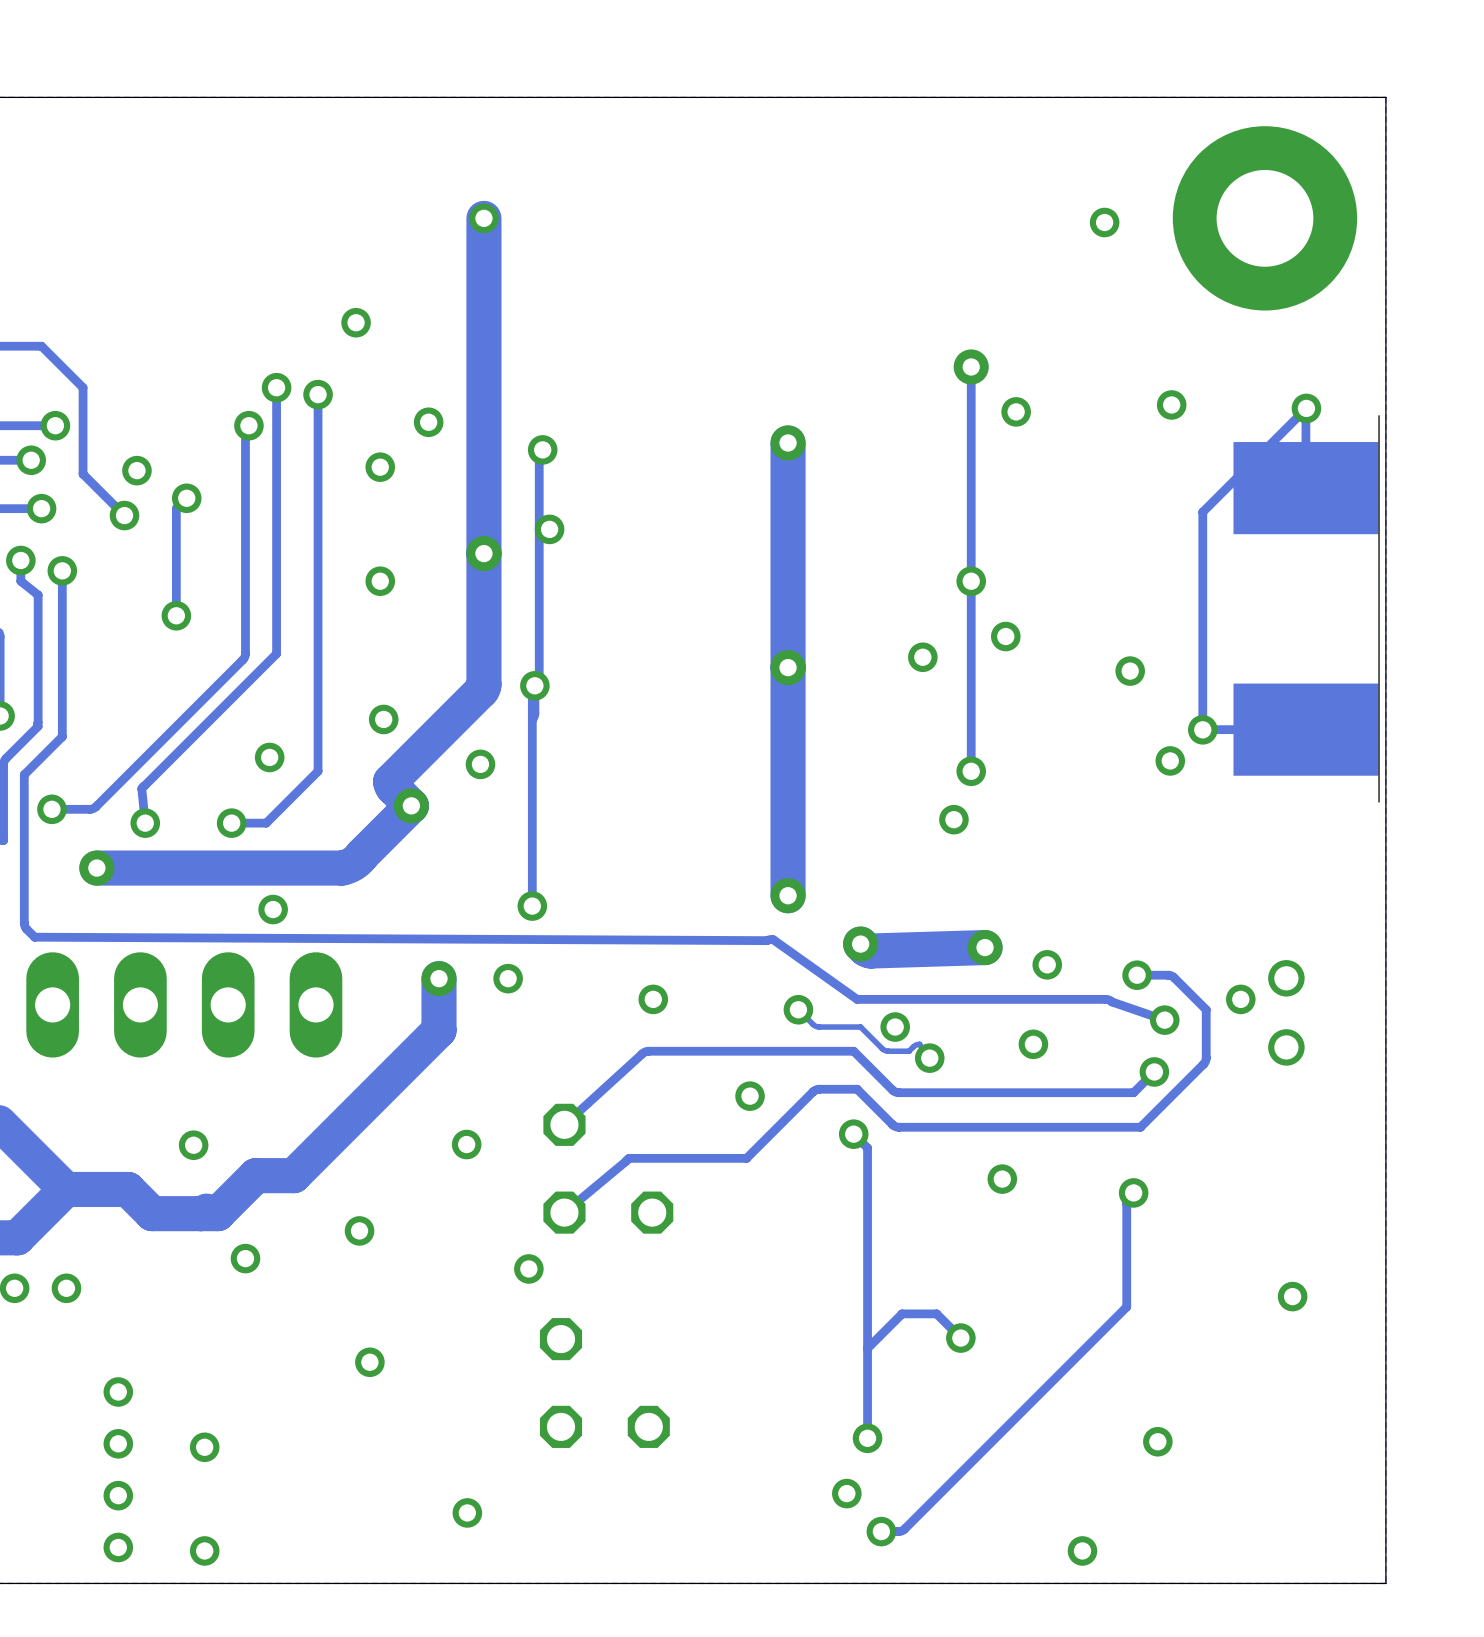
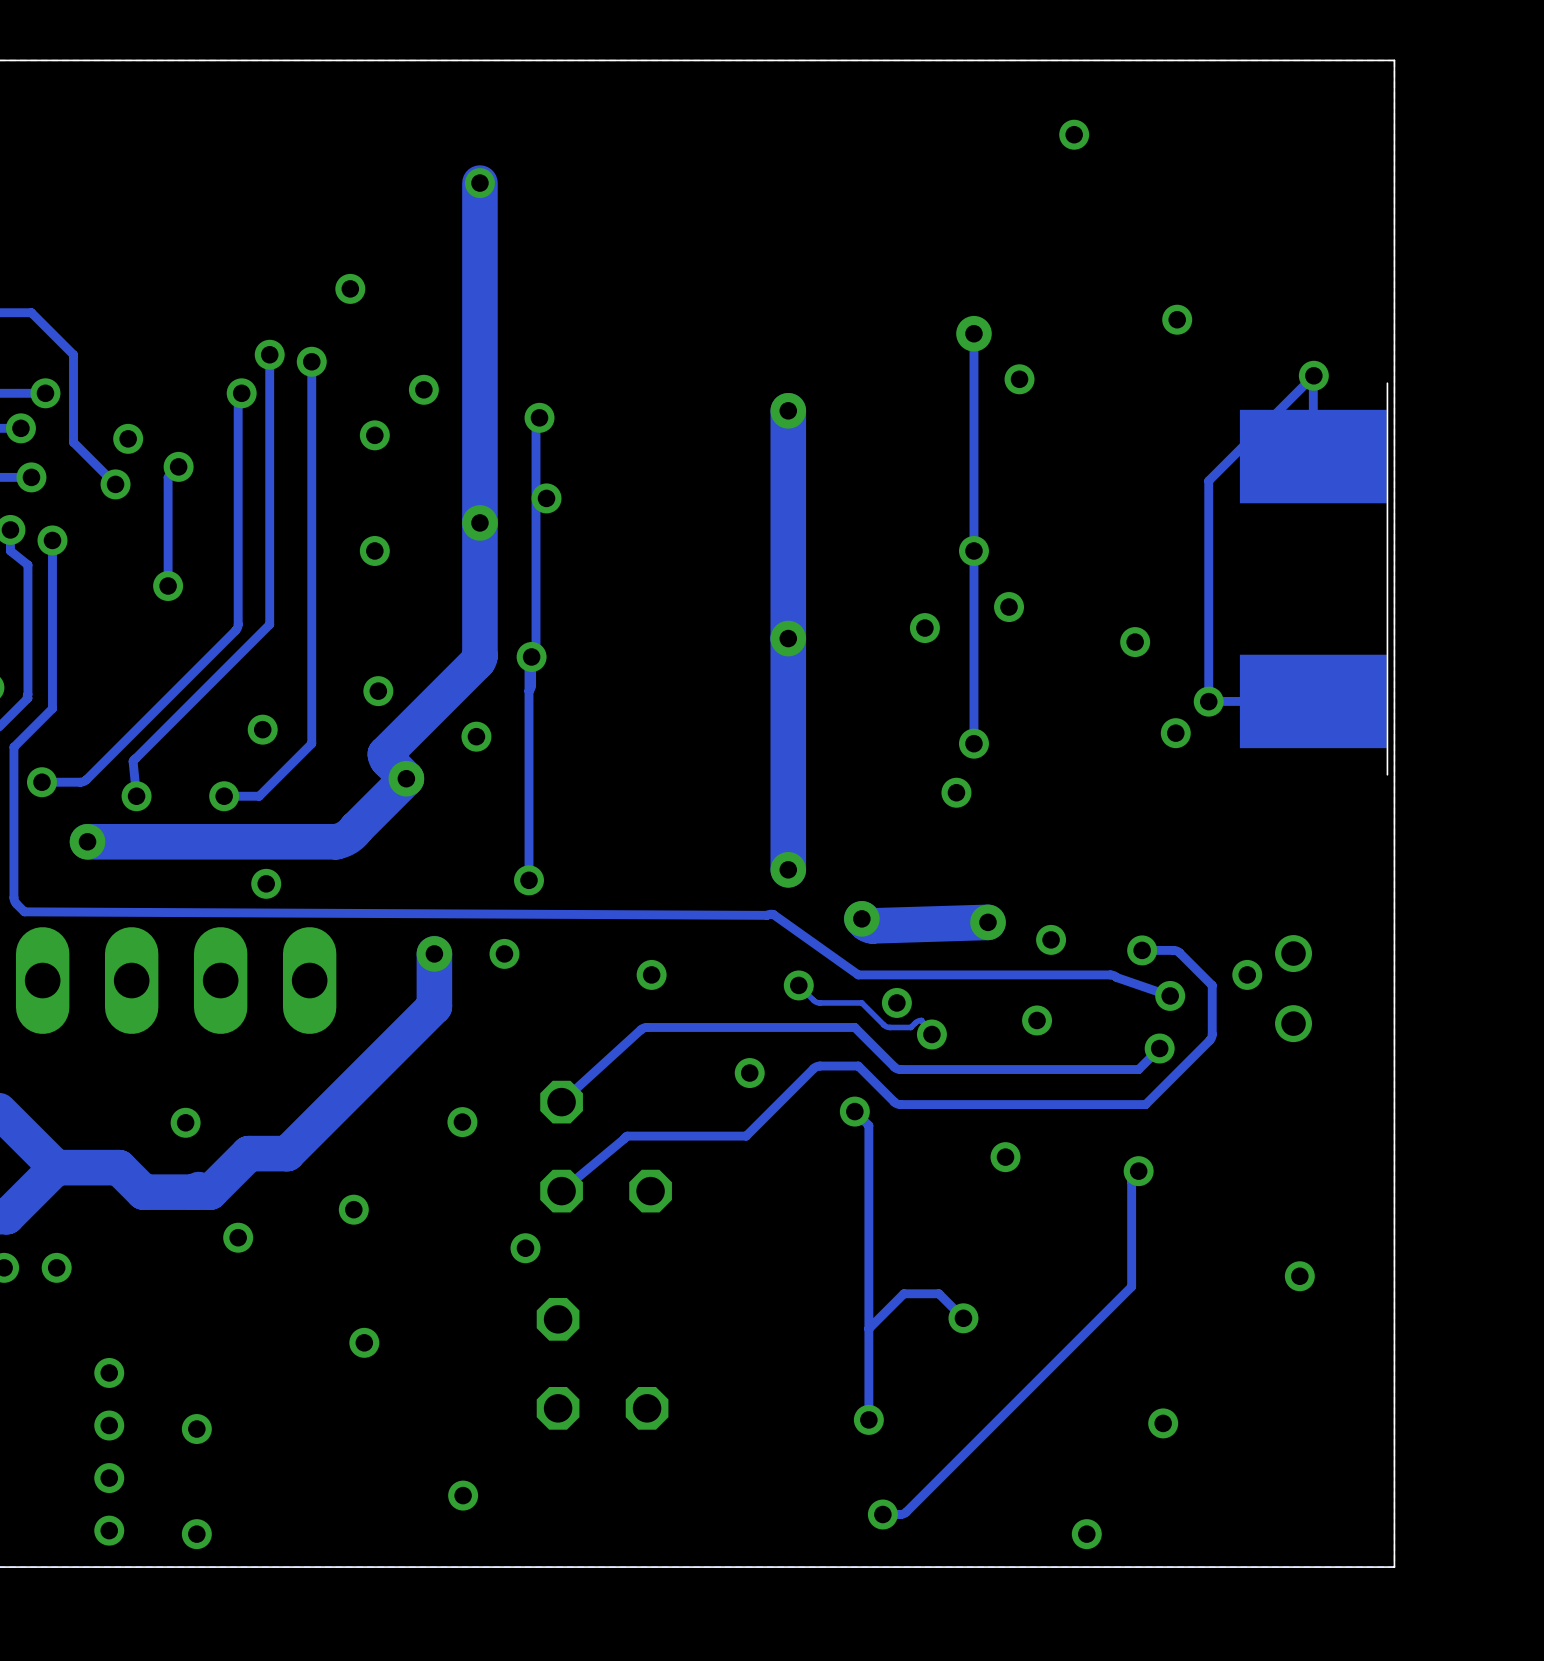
part: (1264, 218) -> none
via position: (1104, 222) -> (1074, 134)
via position: (1171, 404) -> (1177, 319)
via: (846, 1493) -> none

